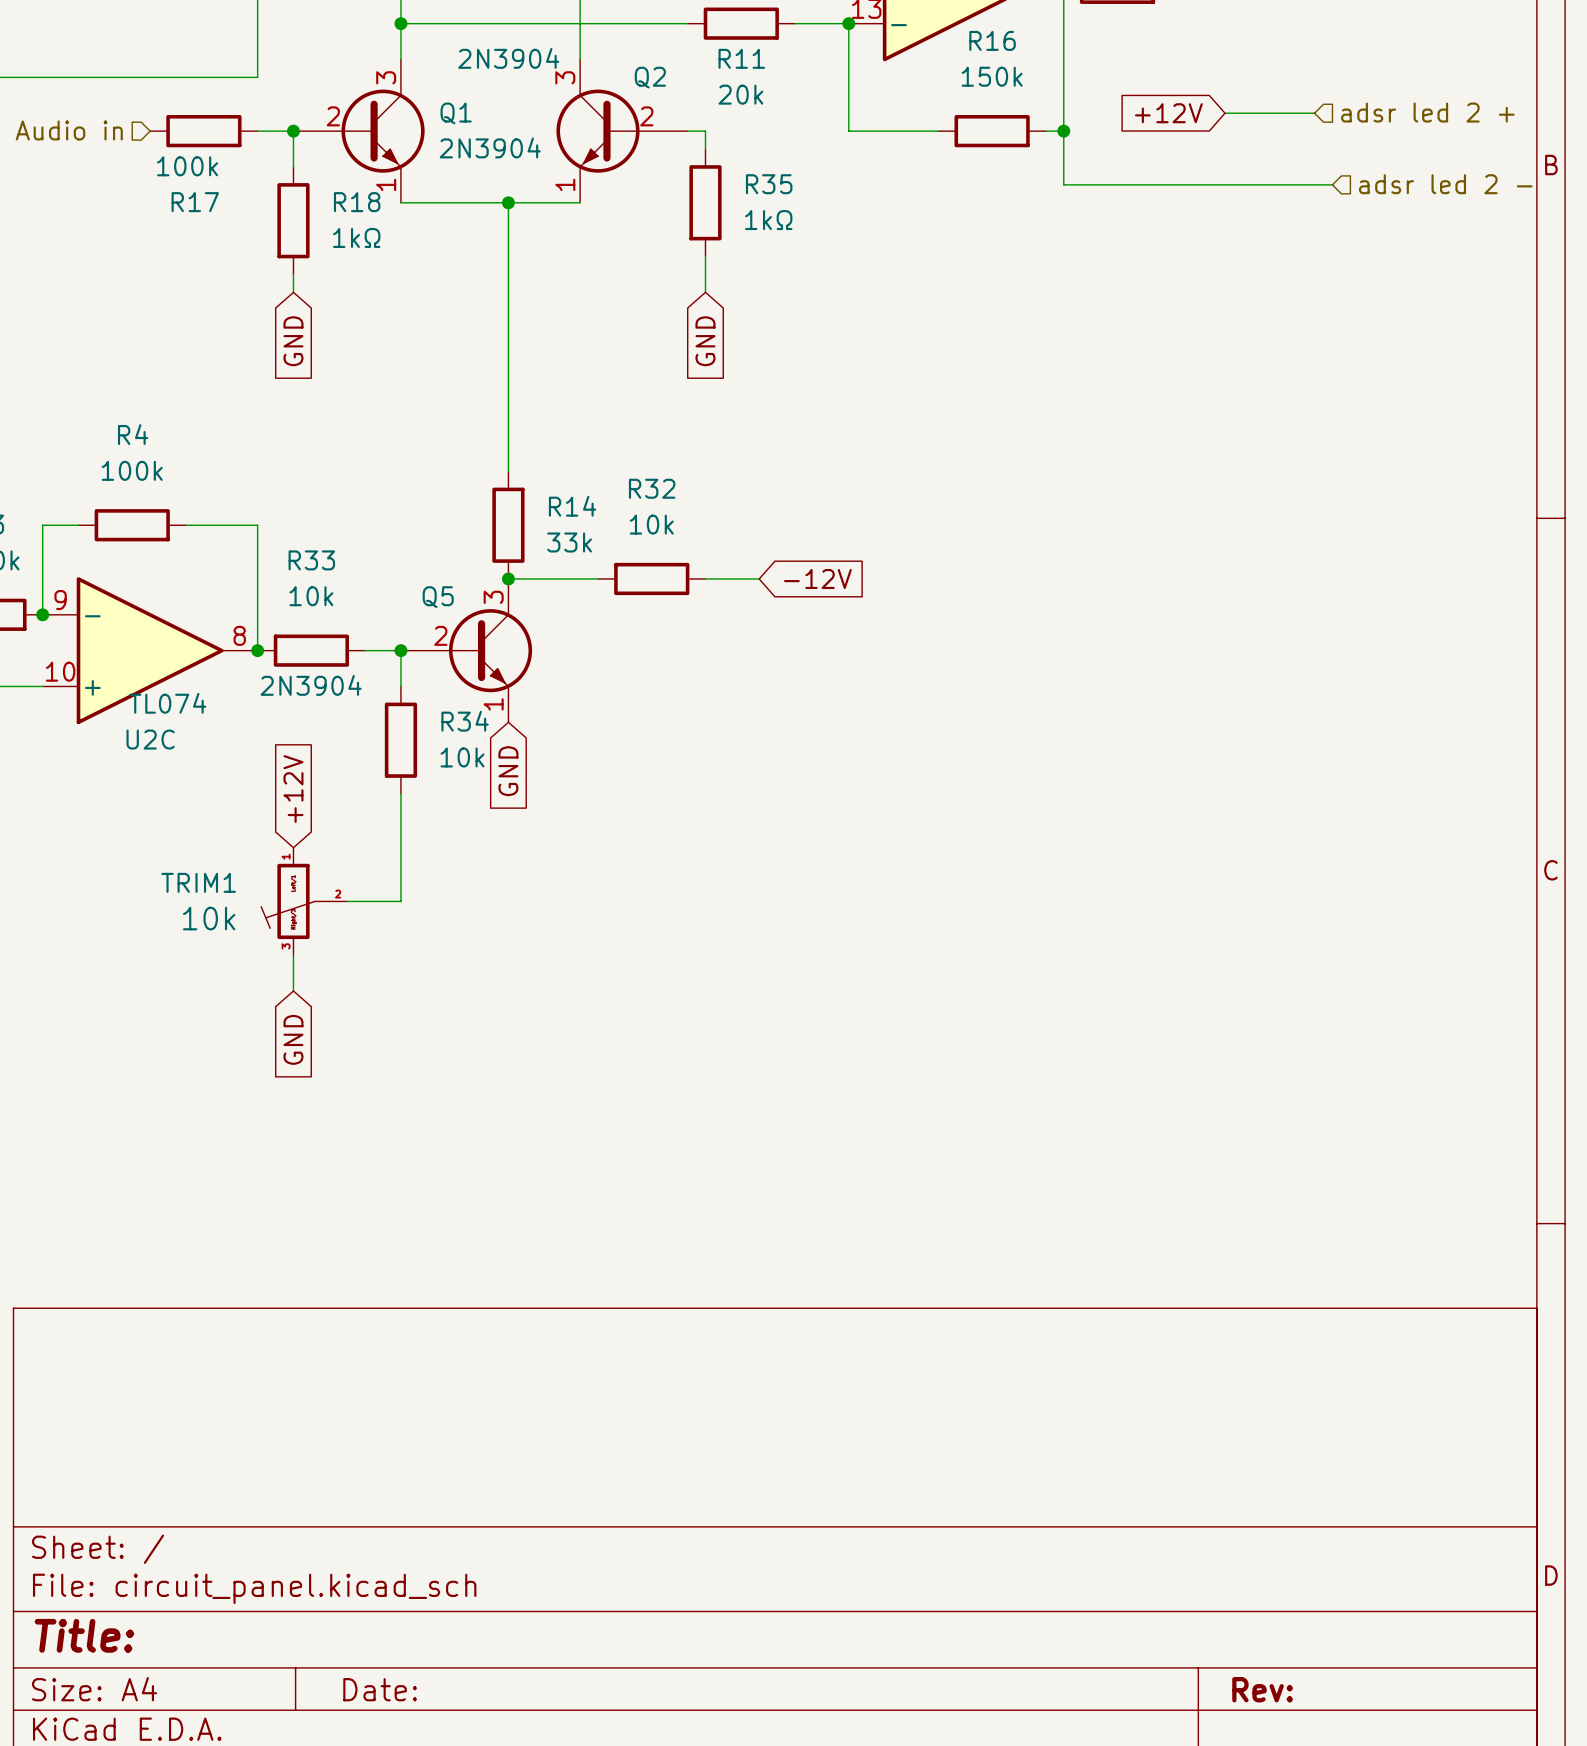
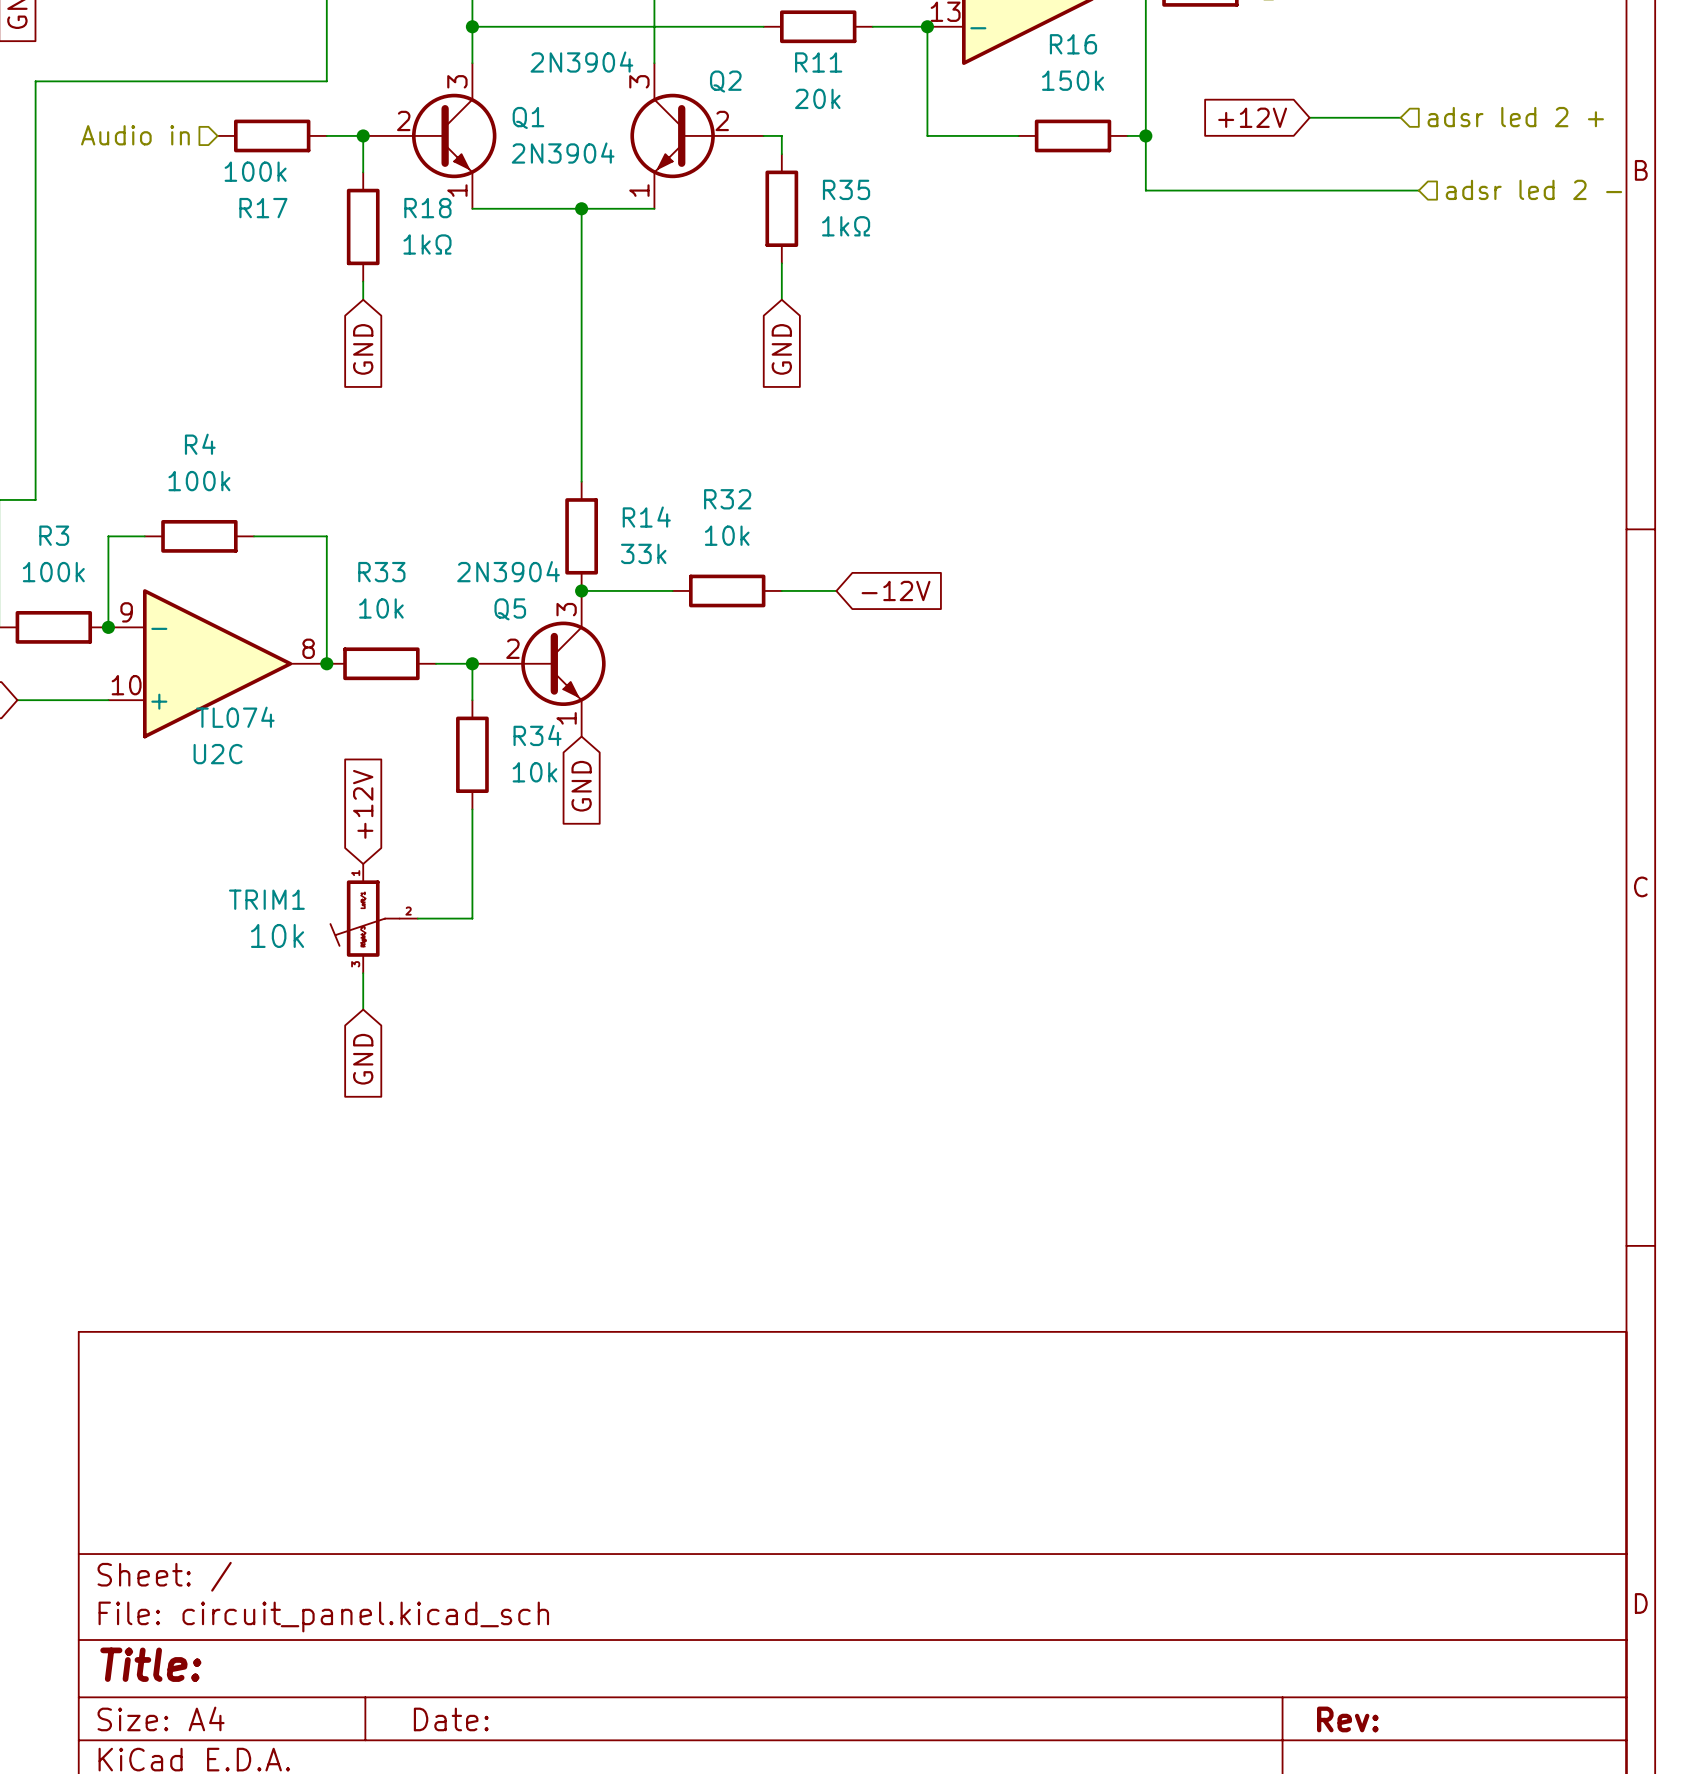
Q5 value position: 2N3904 (311, 685) -> 2N3904 (508, 571)

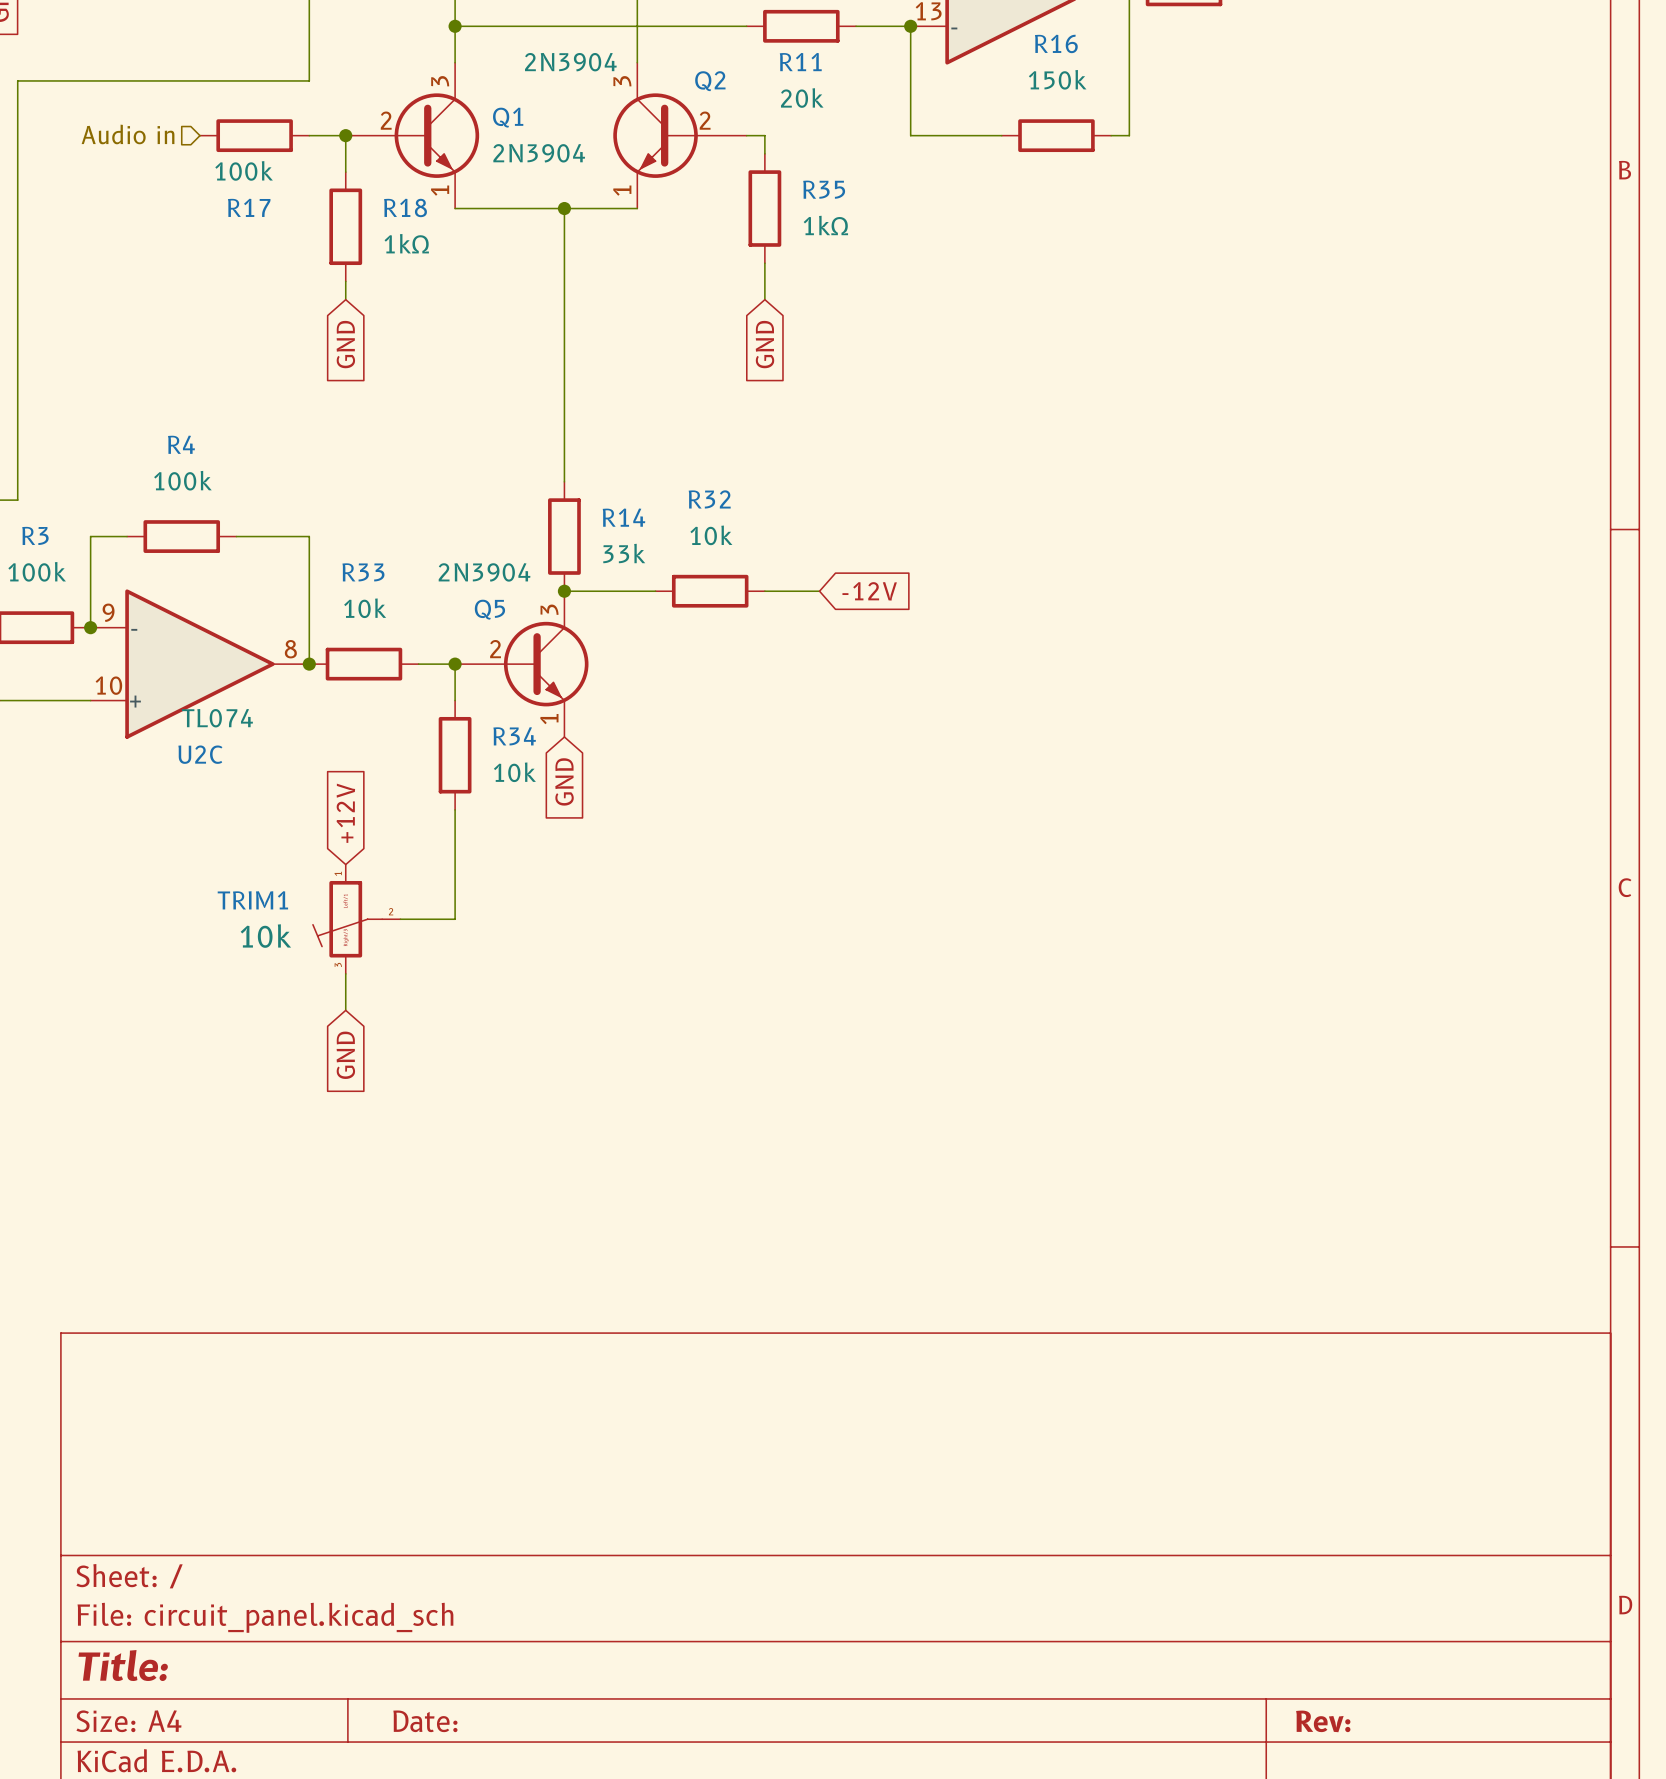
global label: +12V (1252, 117) -> none
wire: (1309, 117) (1400, 117) -> none
hierarchical label: adsr led 2 + (1515, 117) -> none
wire: (1145, 135) (1145, 190) (1418, 190) -> none
junction: (1145, 135) -> none
hierarchical label: adsr led 2 - (1533, 189) -> none

